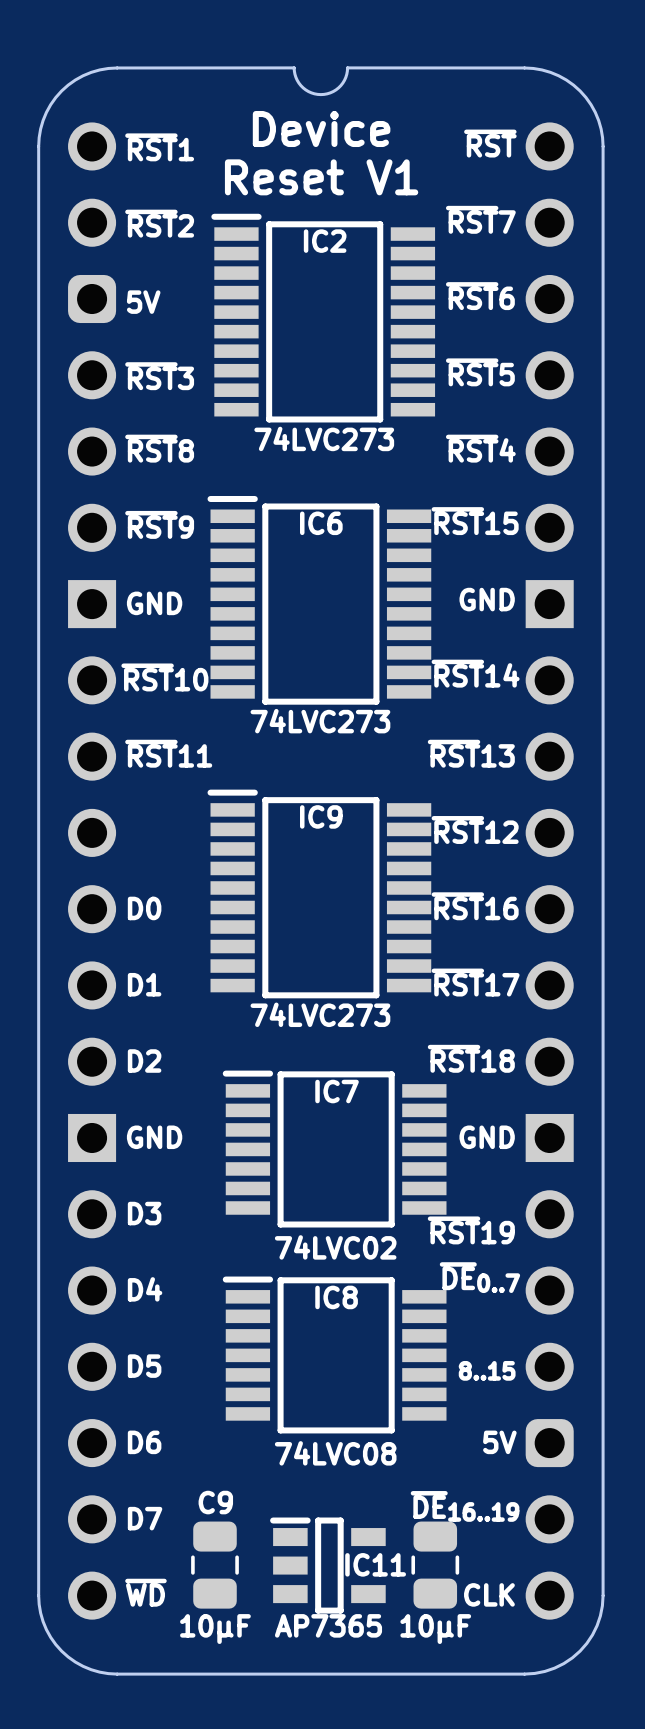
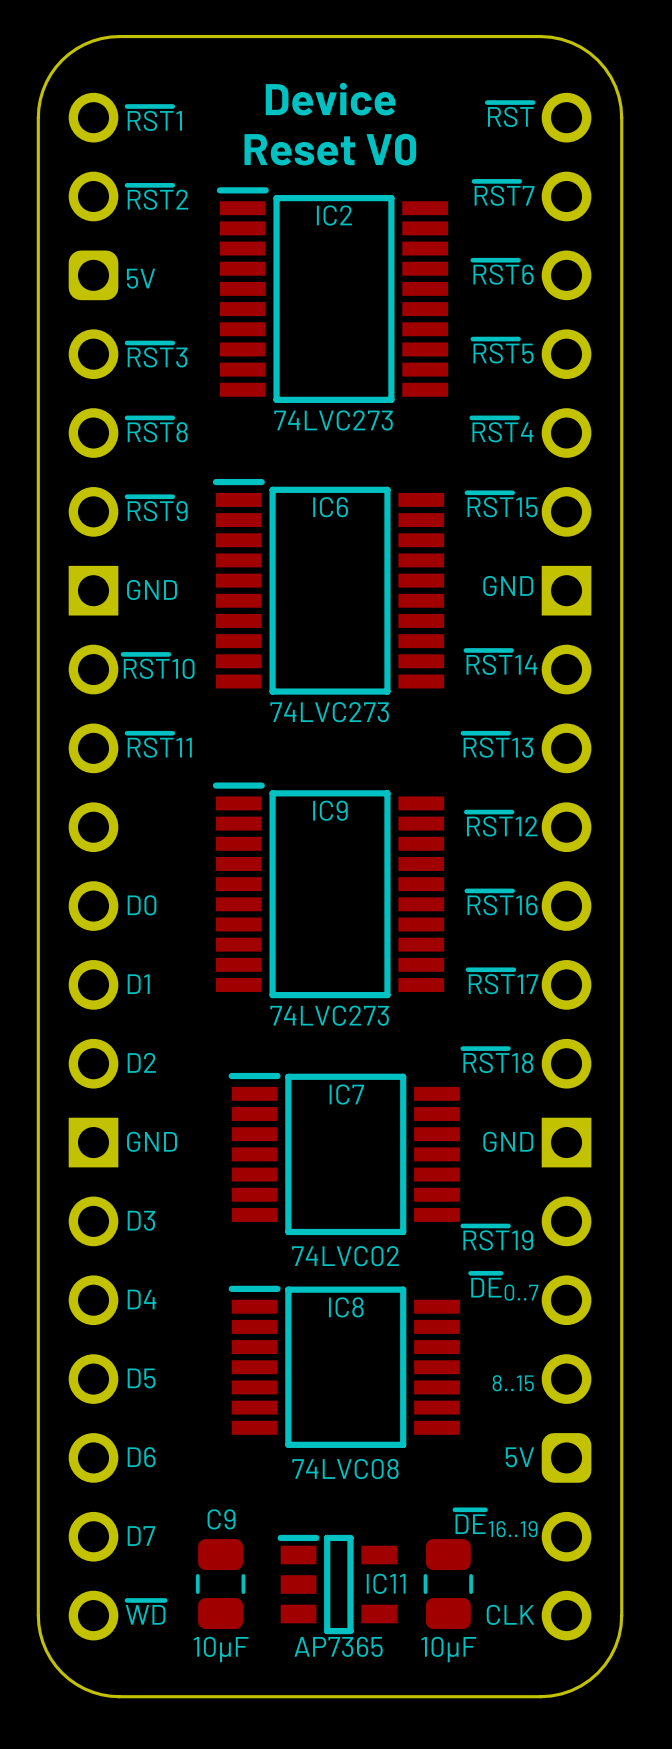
part footprint: [37, 66, 605, 1676] -> [36, 34, 624, 1699]
text: Reset V1 (321, 177) -> Reset V0 (330, 149)

